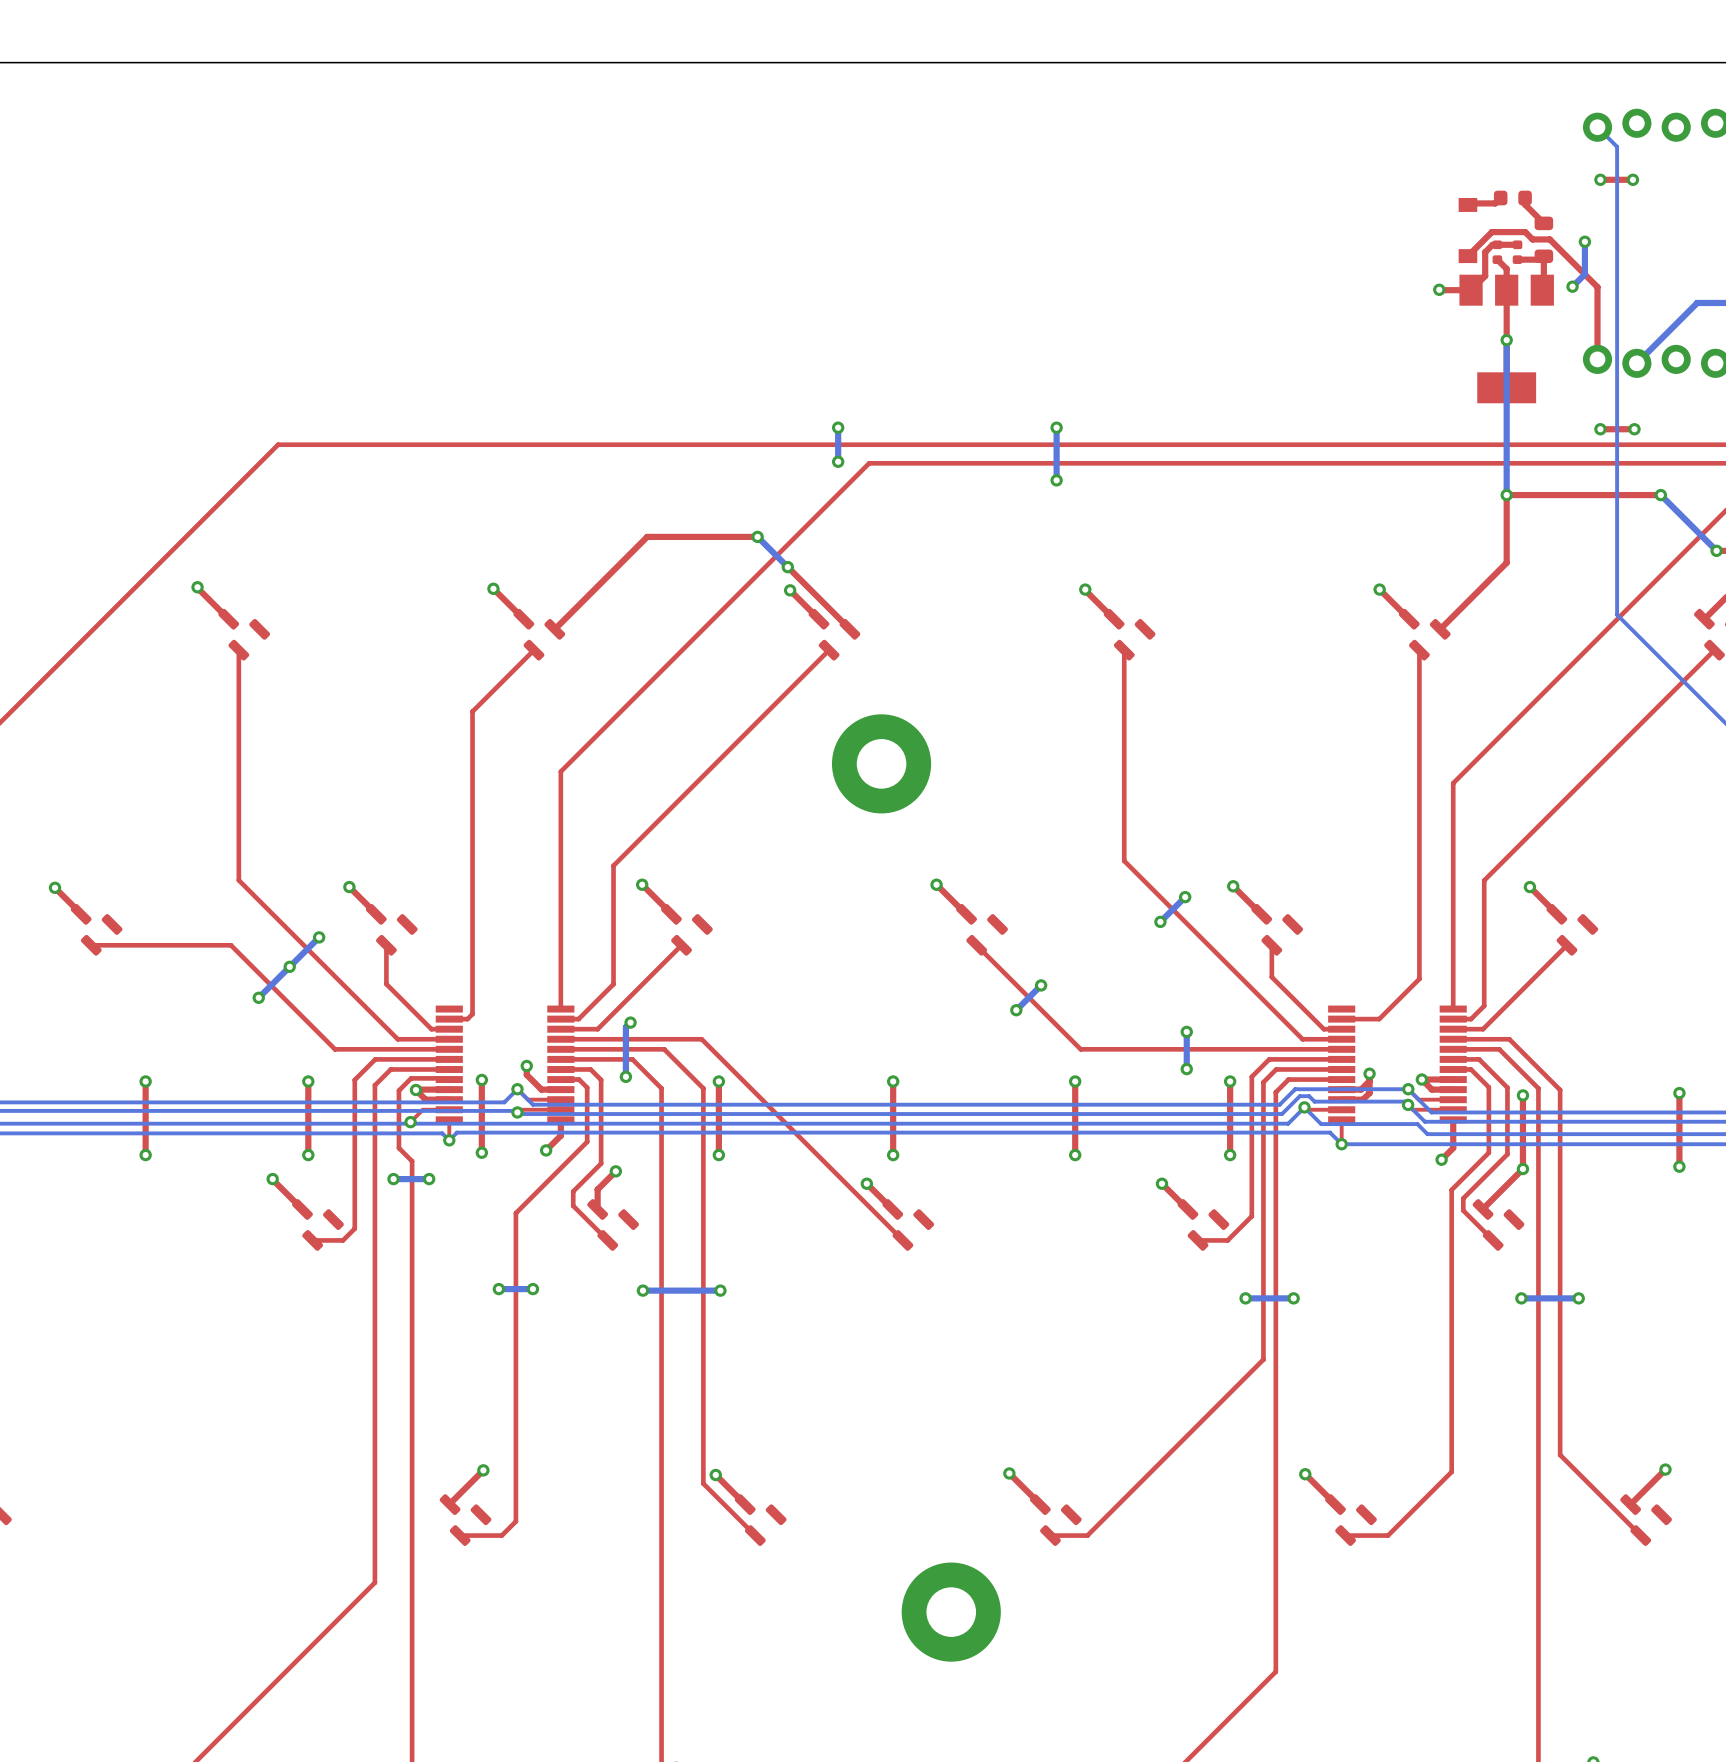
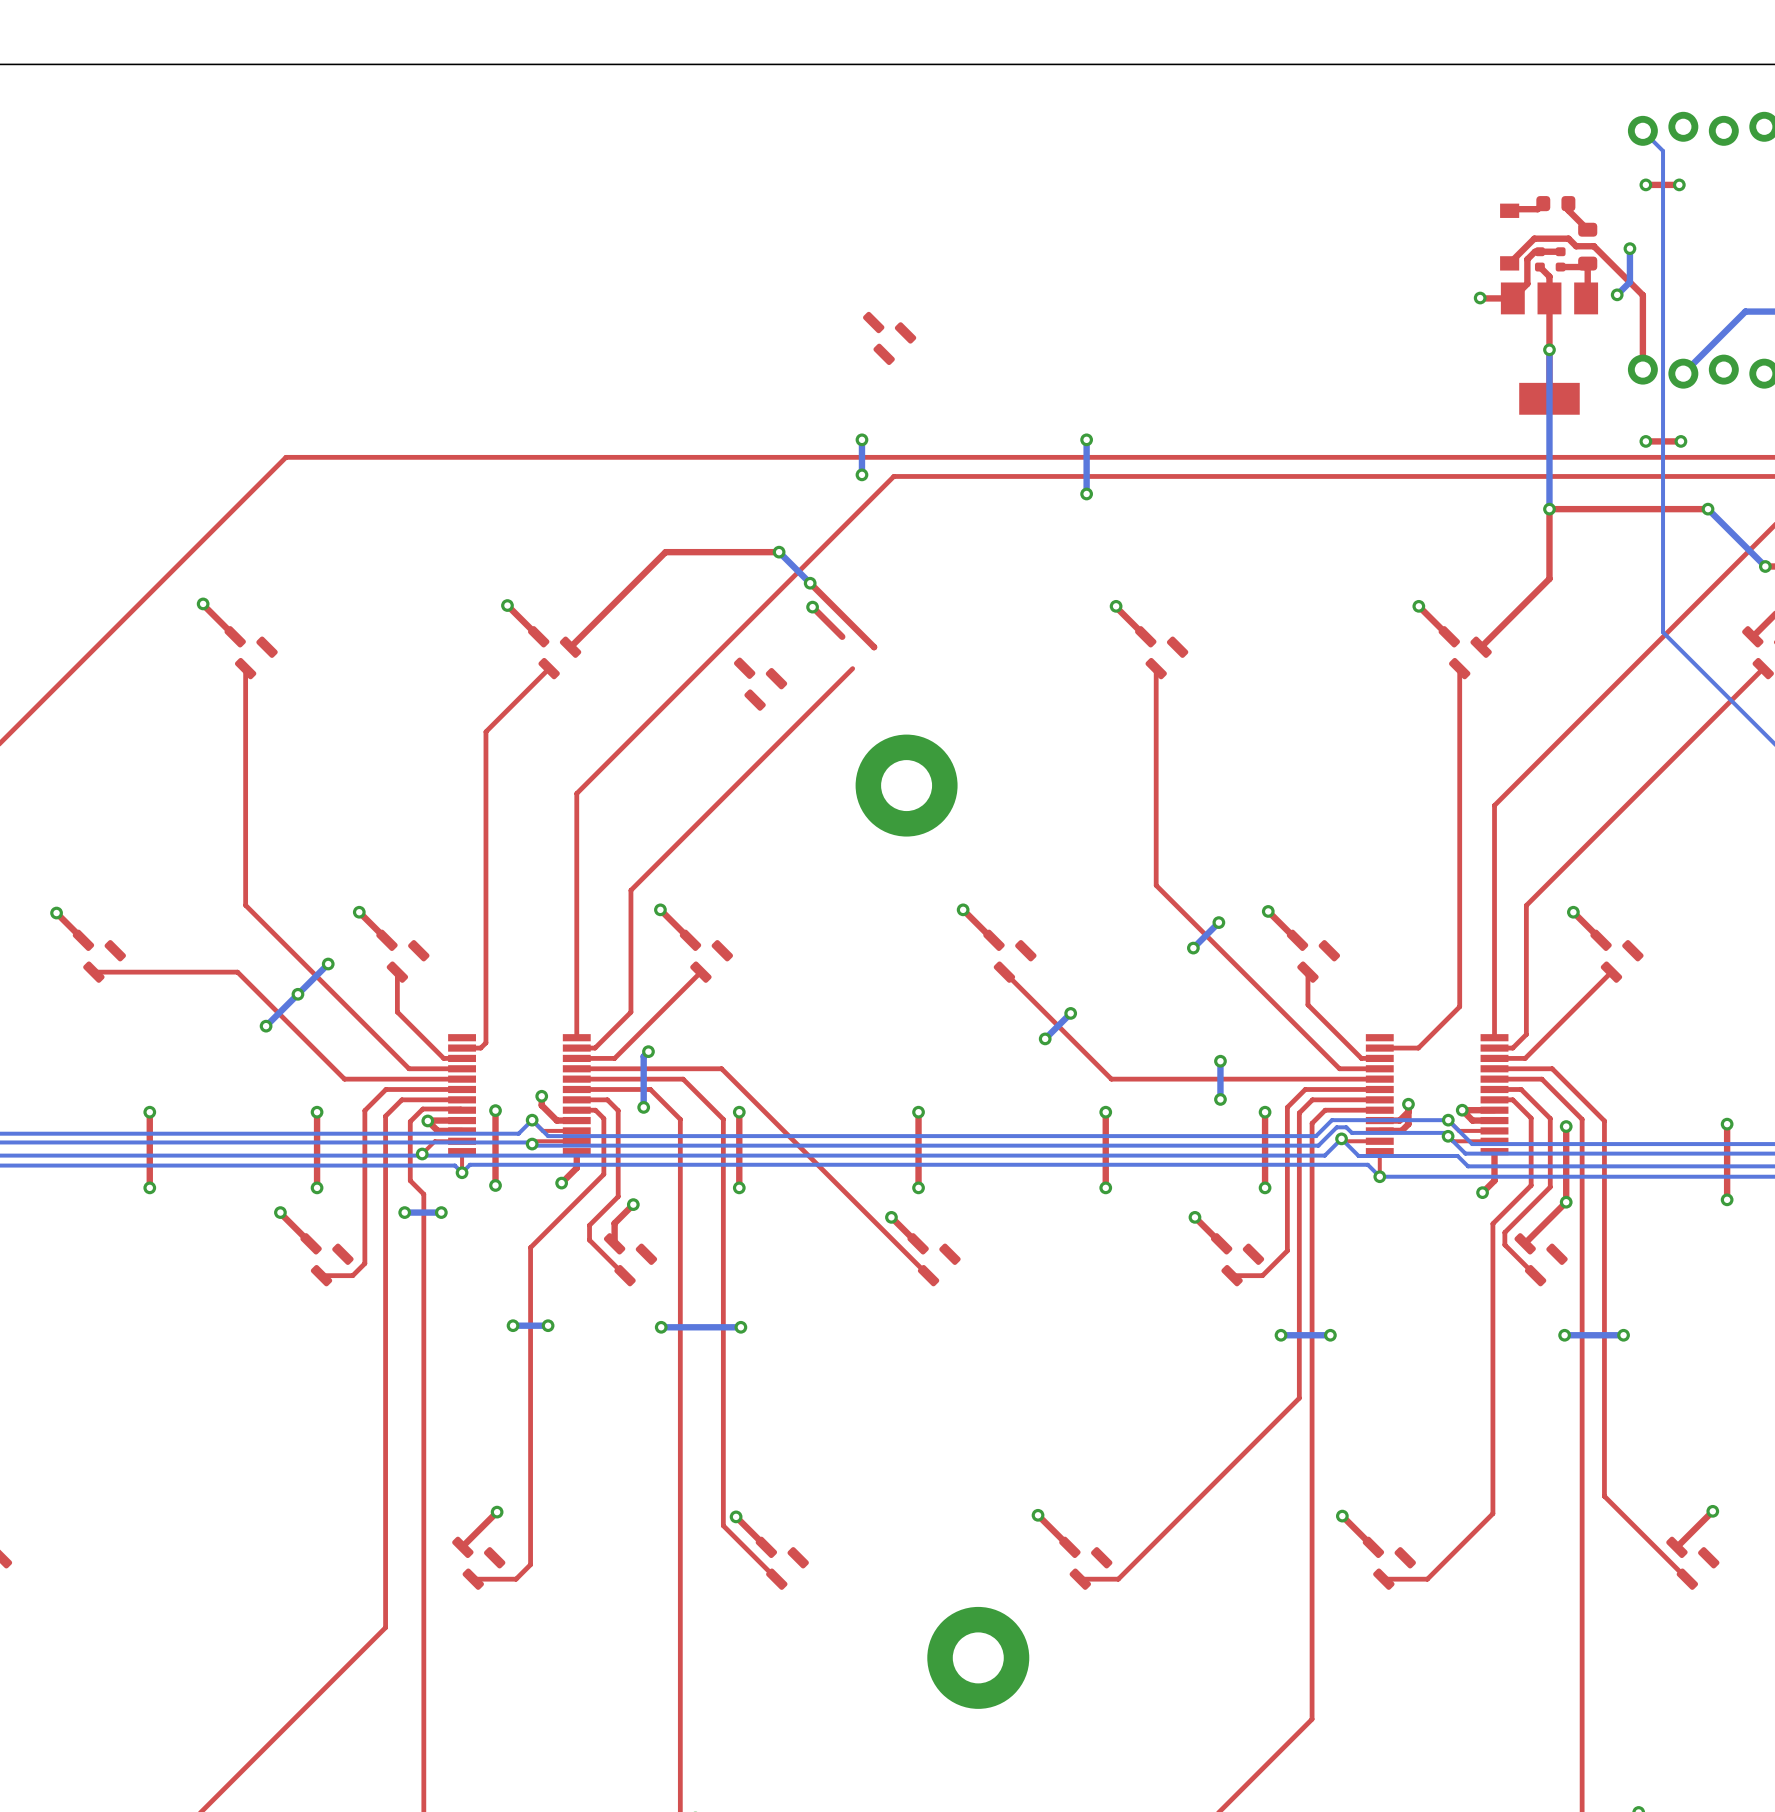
part: none -> (889, 338)
part position: (834, 634) -> (760, 684)

